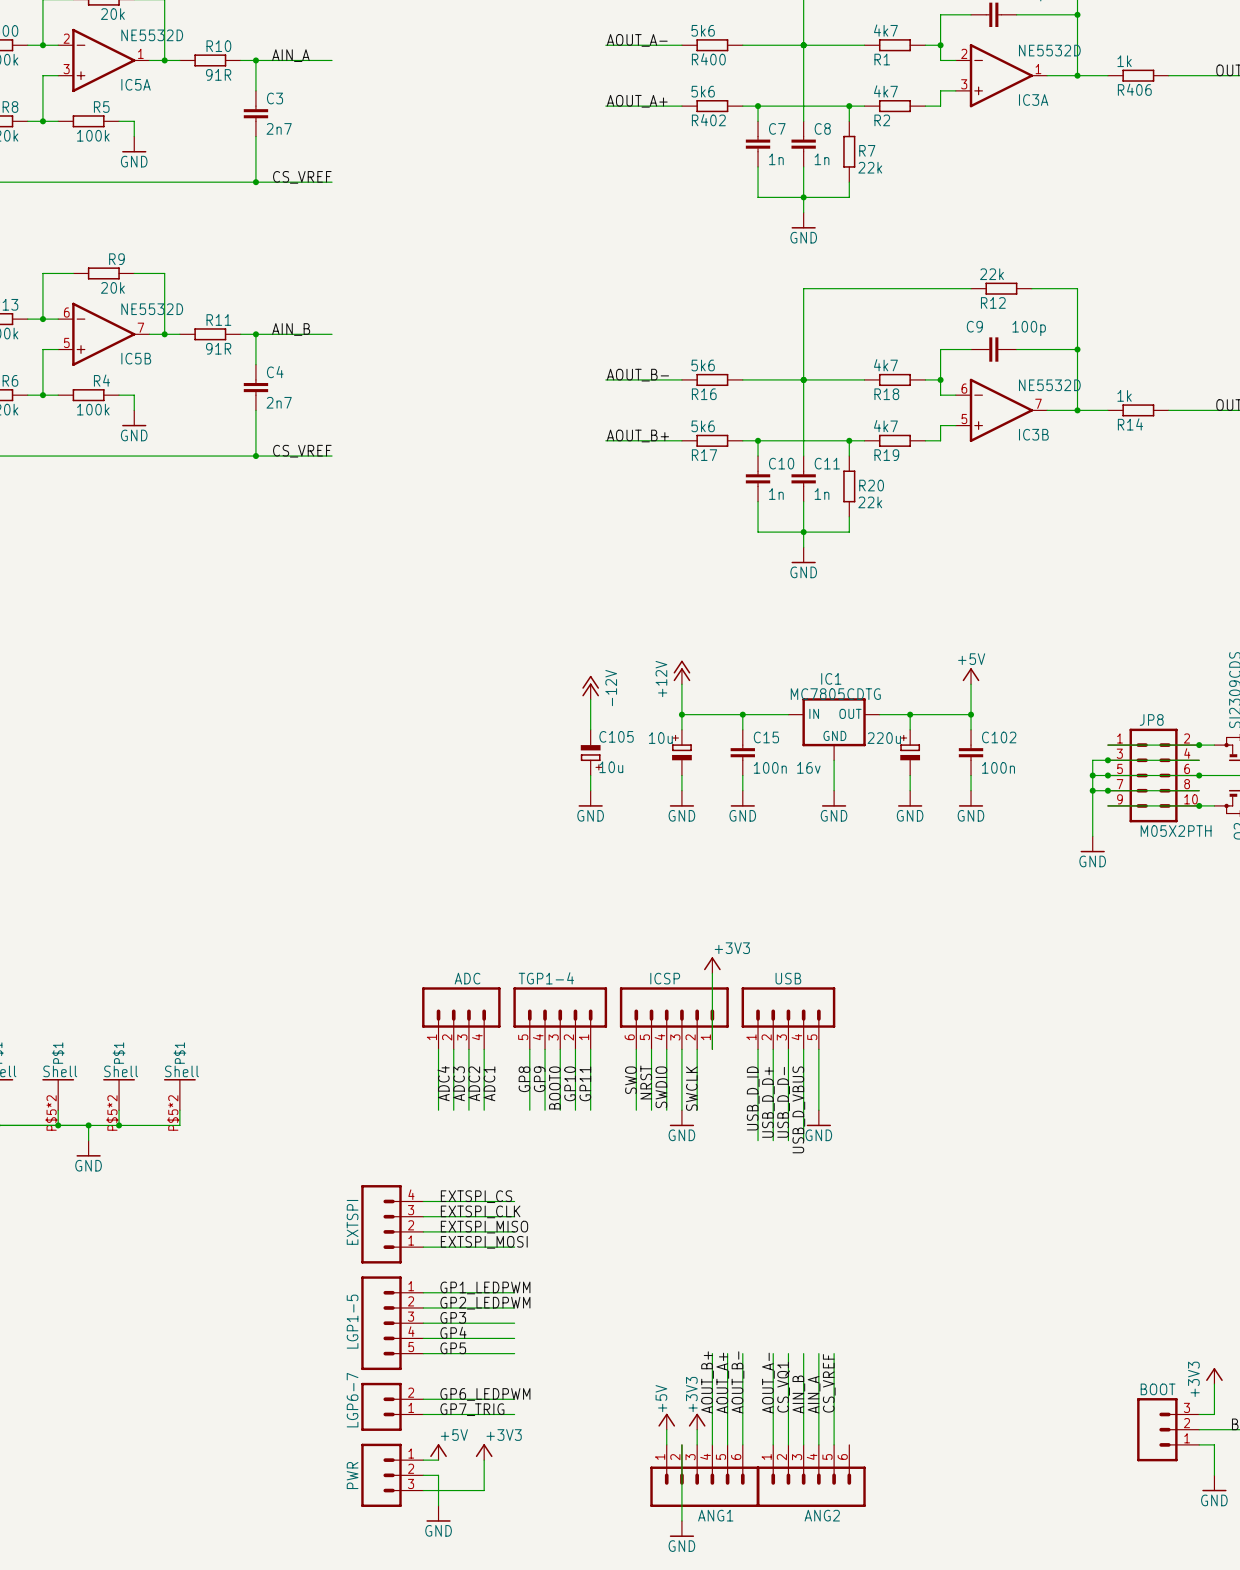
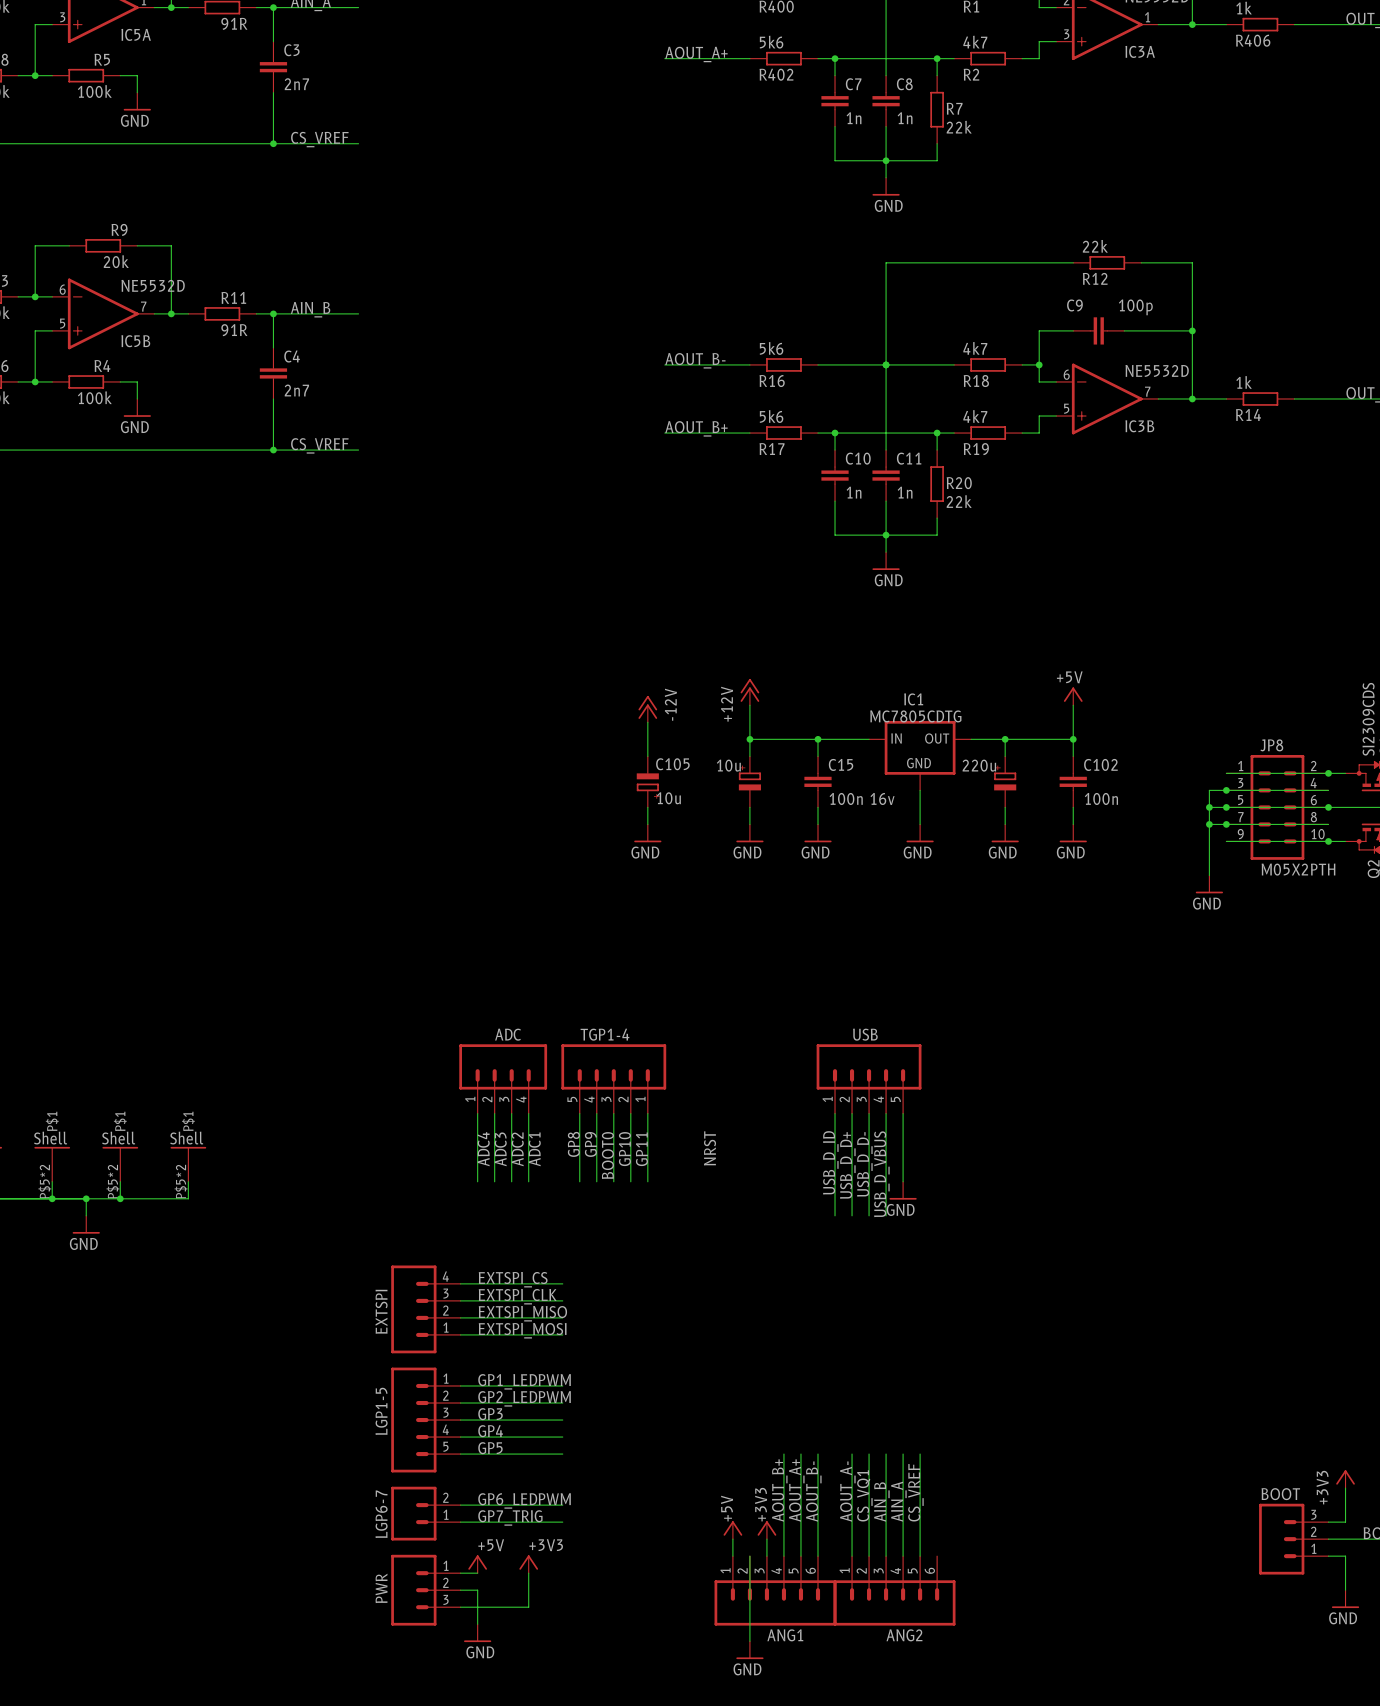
power symbol: +3V3 (712, 965) -> none
wire: (712, 973) (712, 1049) -> none
ICSP: (674, 1018) -> none
wire: (636, 1049) (636, 1110) -> none
wire: (651, 1049) (651, 1110) -> none
wire: (666, 1049) (666, 1110) -> none
wire: (681, 1049) (681, 1110) -> none
wire: (697, 1049) (697, 1110) -> none
label: SWO (630, 1080) -> none
label: SWDIO (661, 1087) -> none
label: SWCLK (691, 1088) -> none
power symbol: GND (681, 1118) -> none

